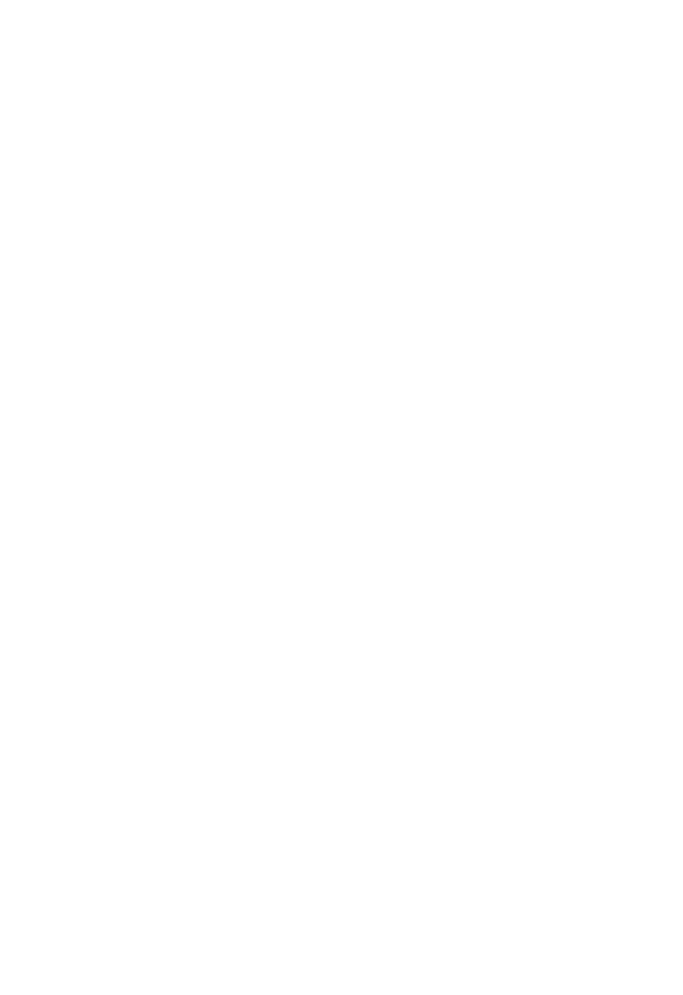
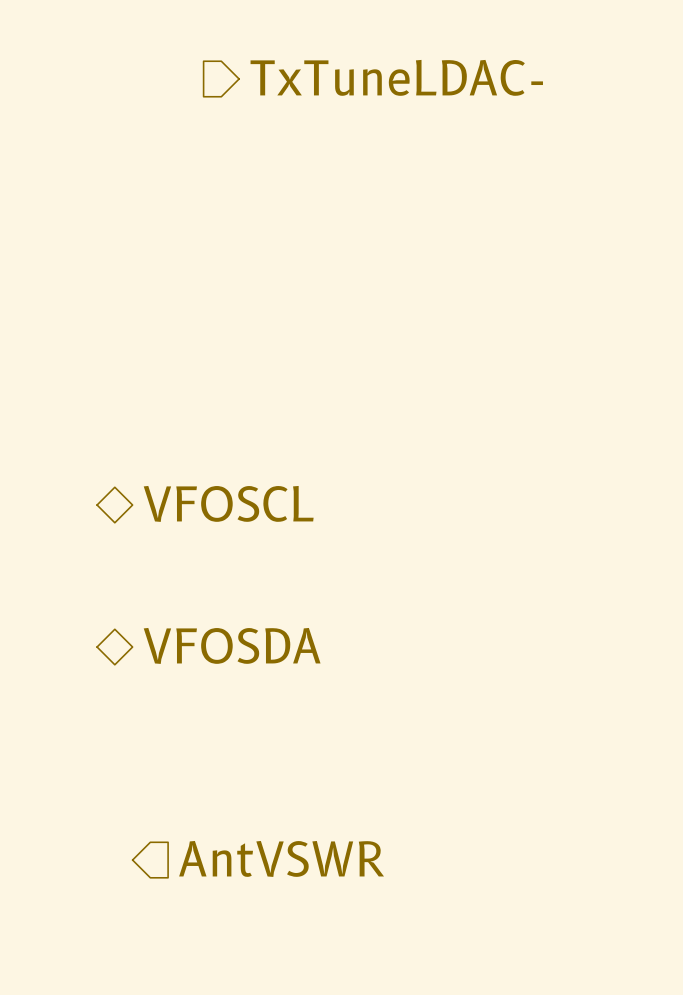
hierarchical label: none -> TxTuneLDAC- (396, 77)
hierarchical label: none -> VFOSCL (228, 503)
hierarchical label: none -> VFOSDA (232, 645)
hierarchical label: none -> AntVSWR (281, 858)

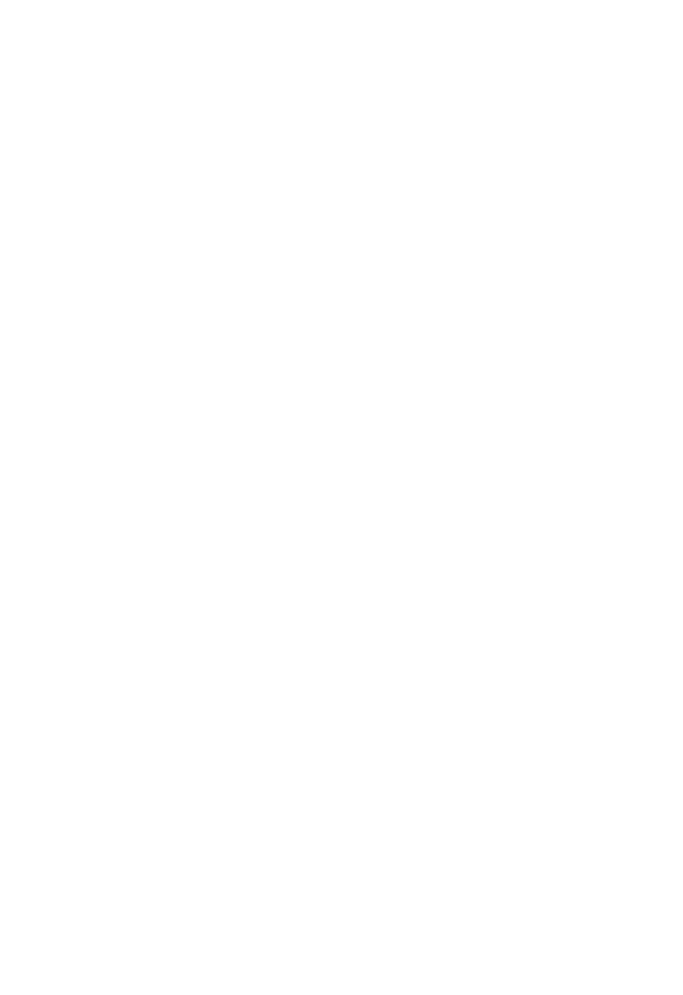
hierarchical label: TxTuneLDAC- (396, 77) -> none
hierarchical label: VFOSCL (228, 503) -> none
hierarchical label: VFOSDA (232, 645) -> none
hierarchical label: AntVSWR (281, 858) -> none

